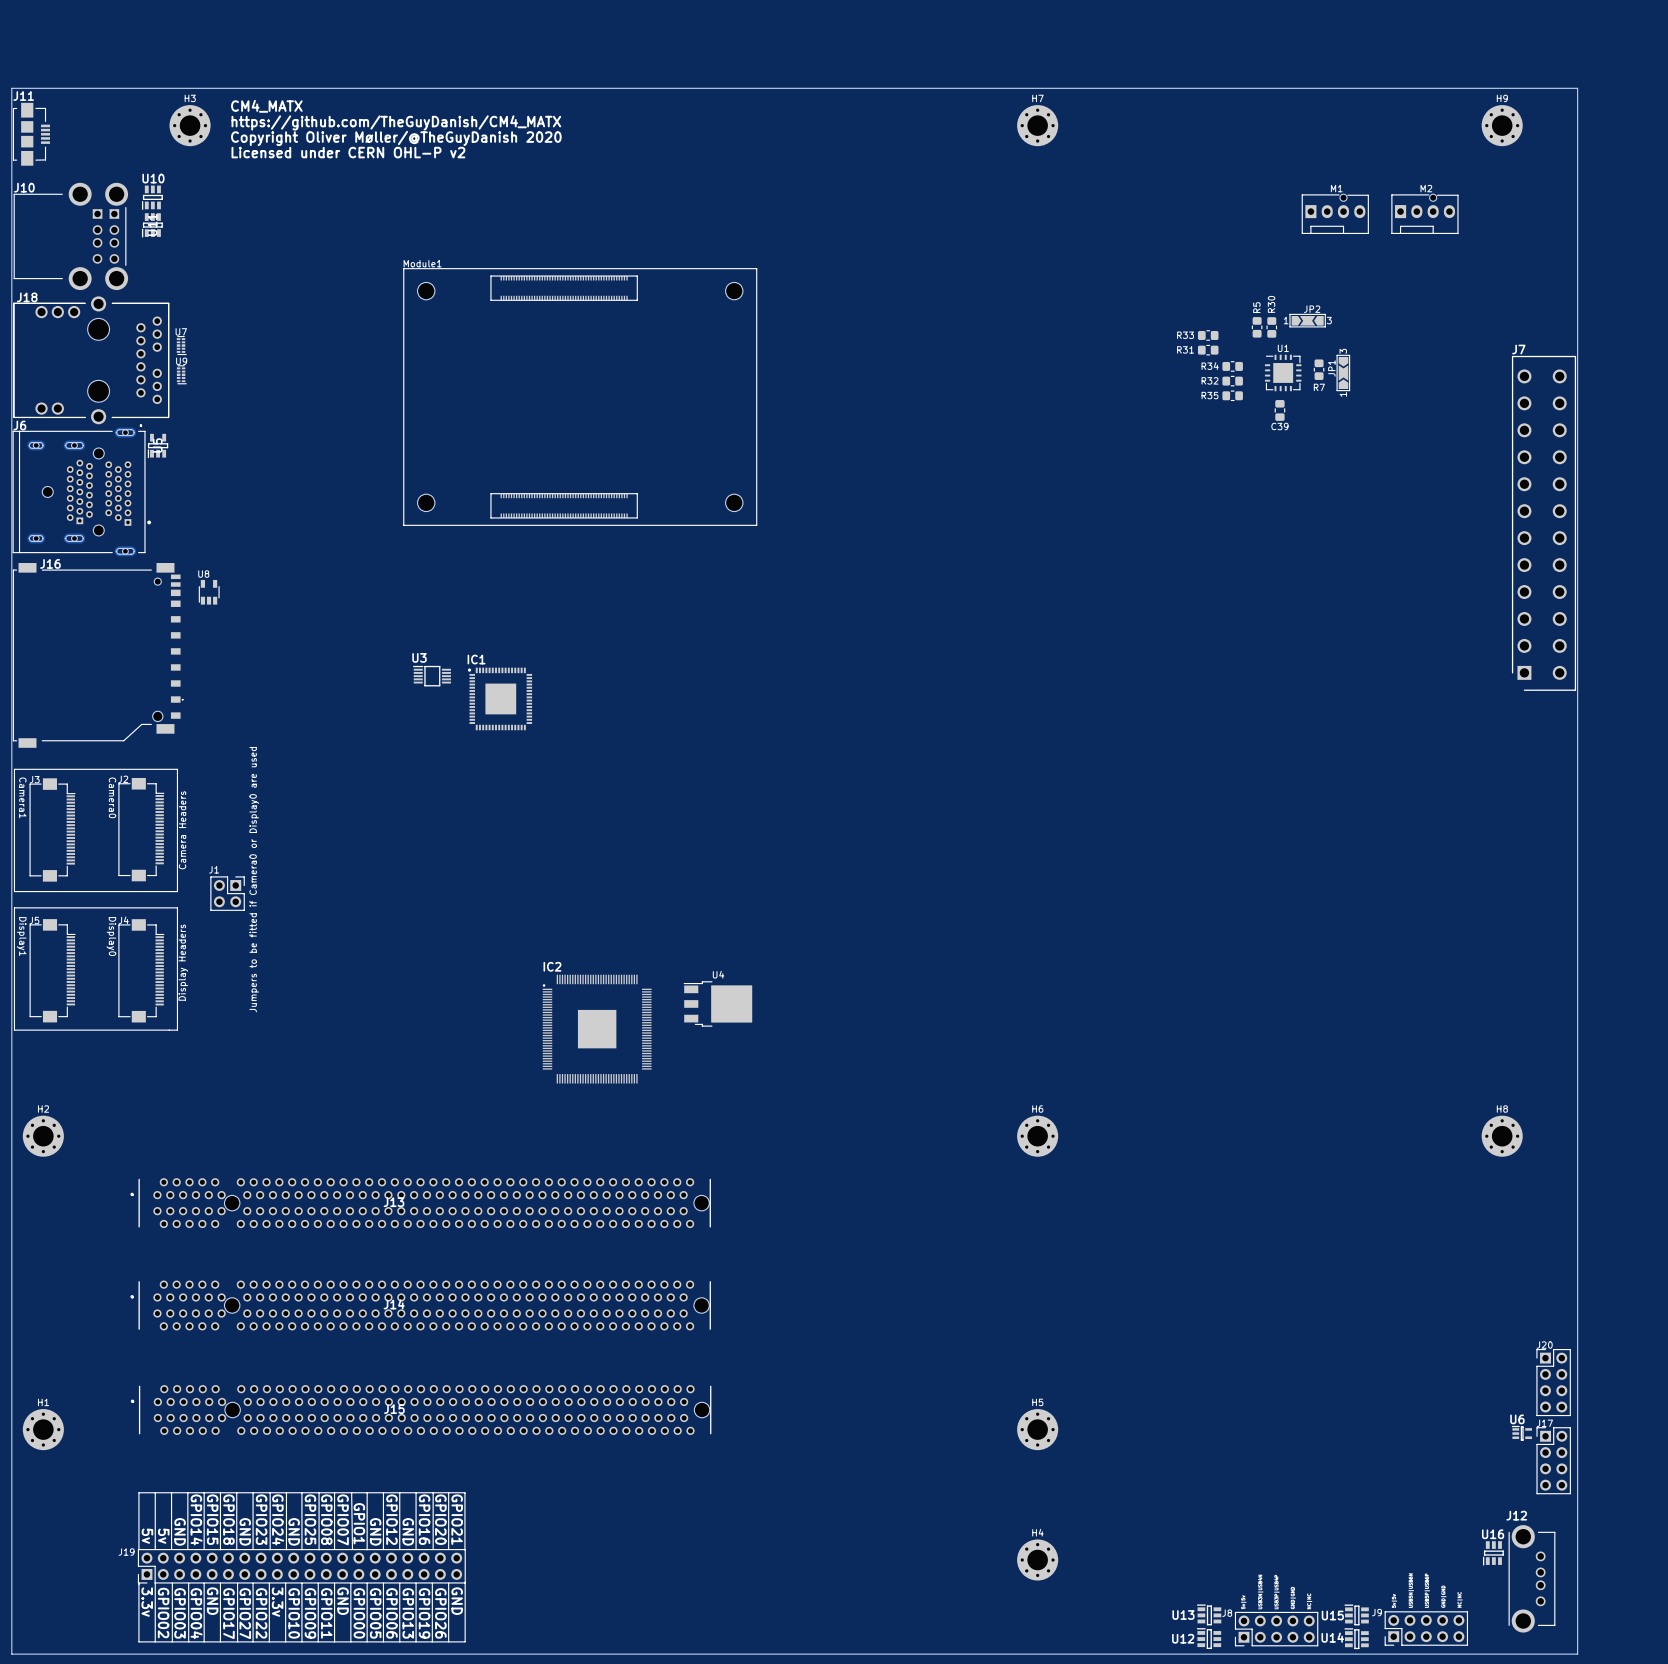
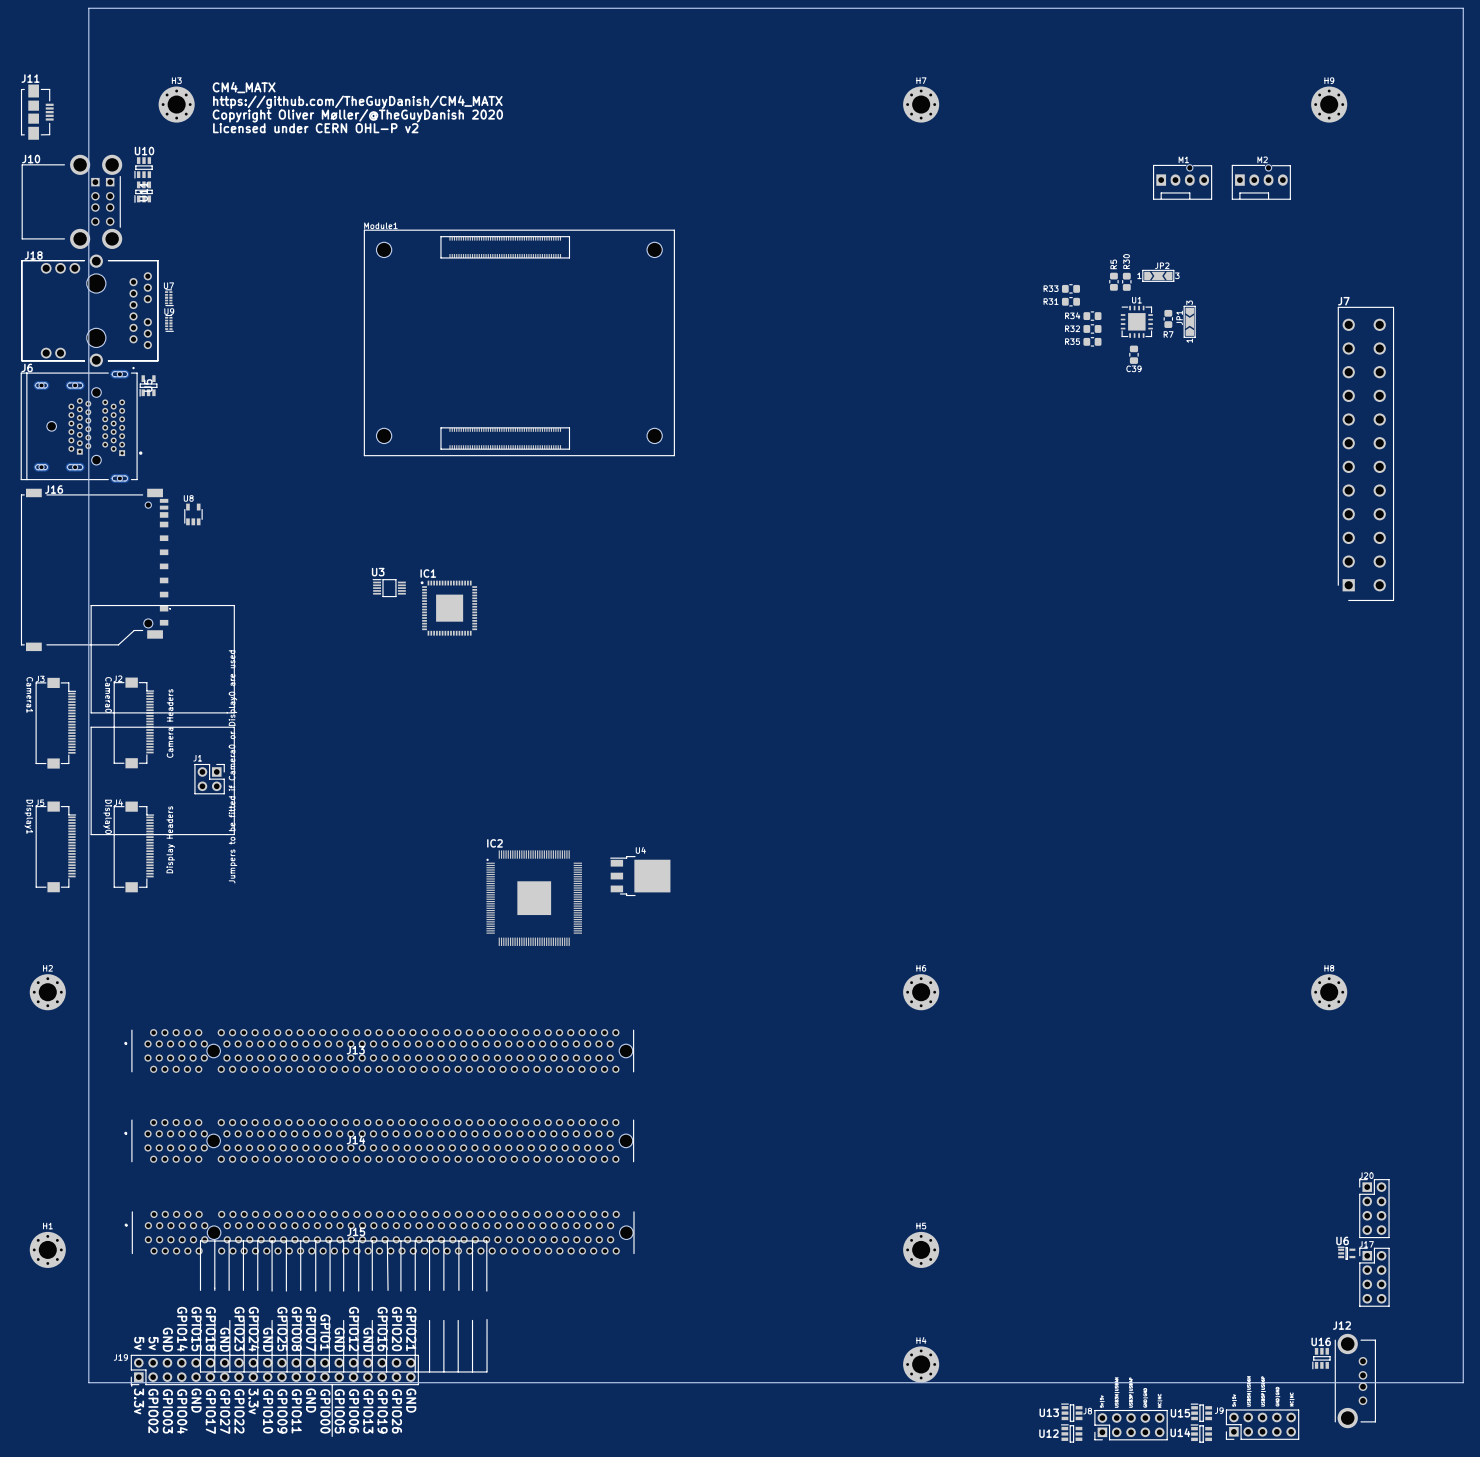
board edge: (11, 88) (1577, 88) (1577, 1654) (11, 1654) (11, 88) -> (88, 8) (88, 1382) (1463, 1382) (1463, 8) (88, 8)
line: (14, 769) (14, 891) (177, 891) (177, 769) (14, 769) -> (91, 605) (91, 712) (234, 712) (234, 605) (91, 605)
line: (14, 907) (177, 907) (177, 1030) (14, 1030) (14, 907) -> (91, 727) (234, 727) (234, 834) (91, 834) (91, 727)
line: (155, 1492) (155, 1549) -> (214, 1240) (214, 1290)
line: (171, 1492) (171, 1549) -> (229, 1240) (229, 1290)
line: (187, 1492) (187, 1549) -> (243, 1240) (243, 1290)
line: (204, 1492) (204, 1549) -> (257, 1240) (257, 1290)
line: (220, 1492) (220, 1549) -> (272, 1240) (272, 1291)
line: (236, 1492) (236, 1549) -> (286, 1240) (286, 1291)
line: (253, 1492) (253, 1549) -> (300, 1240) (300, 1290)
line: (270, 1492) (270, 1549) -> (315, 1240) (315, 1291)
line: (286, 1492) (286, 1549) -> (330, 1240) (330, 1291)
line: (301, 1492) (301, 1549) -> (343, 1240) (343, 1291)
line: (319, 1492) (319, 1549) -> (358, 1240) (358, 1291)
line: (334, 1492) (334, 1549) -> (372, 1240) (372, 1290)
line: (351, 1492) (352, 1549) -> (387, 1240) (388, 1290)
line: (367, 1492) (367, 1549) -> (400, 1240) (400, 1291)
line: (383, 1492) (383, 1549) -> (415, 1240) (415, 1290)
line: (399, 1492) (399, 1549) -> (429, 1240) (429, 1290)
line: (416, 1492) (416, 1549) -> (443, 1240) (443, 1290)
line: (433, 1492) (433, 1549) -> (458, 1240) (458, 1290)
line: (448, 1492) (448, 1549) -> (472, 1240) (472, 1290)
line: (138, 1549) (138, 1492) (464, 1492) (464, 1549) -> (200, 1290) (200, 1240) (486, 1240) (486, 1291)
line: (465, 1582) (465, 1641) -> (487, 1319) (487, 1371)
line: (155, 1583) (155, 1641) -> (214, 1320) (214, 1371)
line: (172, 1583) (172, 1641) -> (229, 1320) (229, 1371)
line: (188, 1583) (188, 1641) -> (244, 1320) (244, 1371)
line: (204, 1583) (204, 1641) -> (257, 1320) (257, 1371)
line: (220, 1583) (220, 1641) -> (272, 1320) (272, 1371)
line: (237, 1583) (237, 1641) -> (287, 1320) (287, 1371)
line: (253, 1583) (253, 1641) -> (300, 1320) (300, 1371)
line: (269, 1583) (269, 1641) -> (315, 1320) (315, 1371)
line: (285, 1583) (285, 1641) -> (329, 1320) (329, 1371)
line: (301, 1583) (301, 1641) -> (343, 1320) (343, 1371)
line: (318, 1583) (318, 1641) -> (357, 1320) (357, 1371)
line: (334, 1583) (334, 1641) -> (372, 1320) (372, 1371)
line: (350, 1583) (350, 1641) -> (386, 1320) (386, 1371)
line: (383, 1583) (383, 1641) -> (415, 1320) (415, 1371)
line: (399, 1583) (399, 1641) -> (429, 1320) (429, 1371)
line: (416, 1583) (416, 1641) -> (443, 1320) (443, 1371)
line: (432, 1583) (432, 1641) -> (458, 1320) (458, 1371)
line: (448, 1583) (448, 1641) -> (472, 1320) (472, 1371)
line: (138, 1584) (138, 1641) (464, 1641) -> (200, 1321) (200, 1371) (486, 1371)

